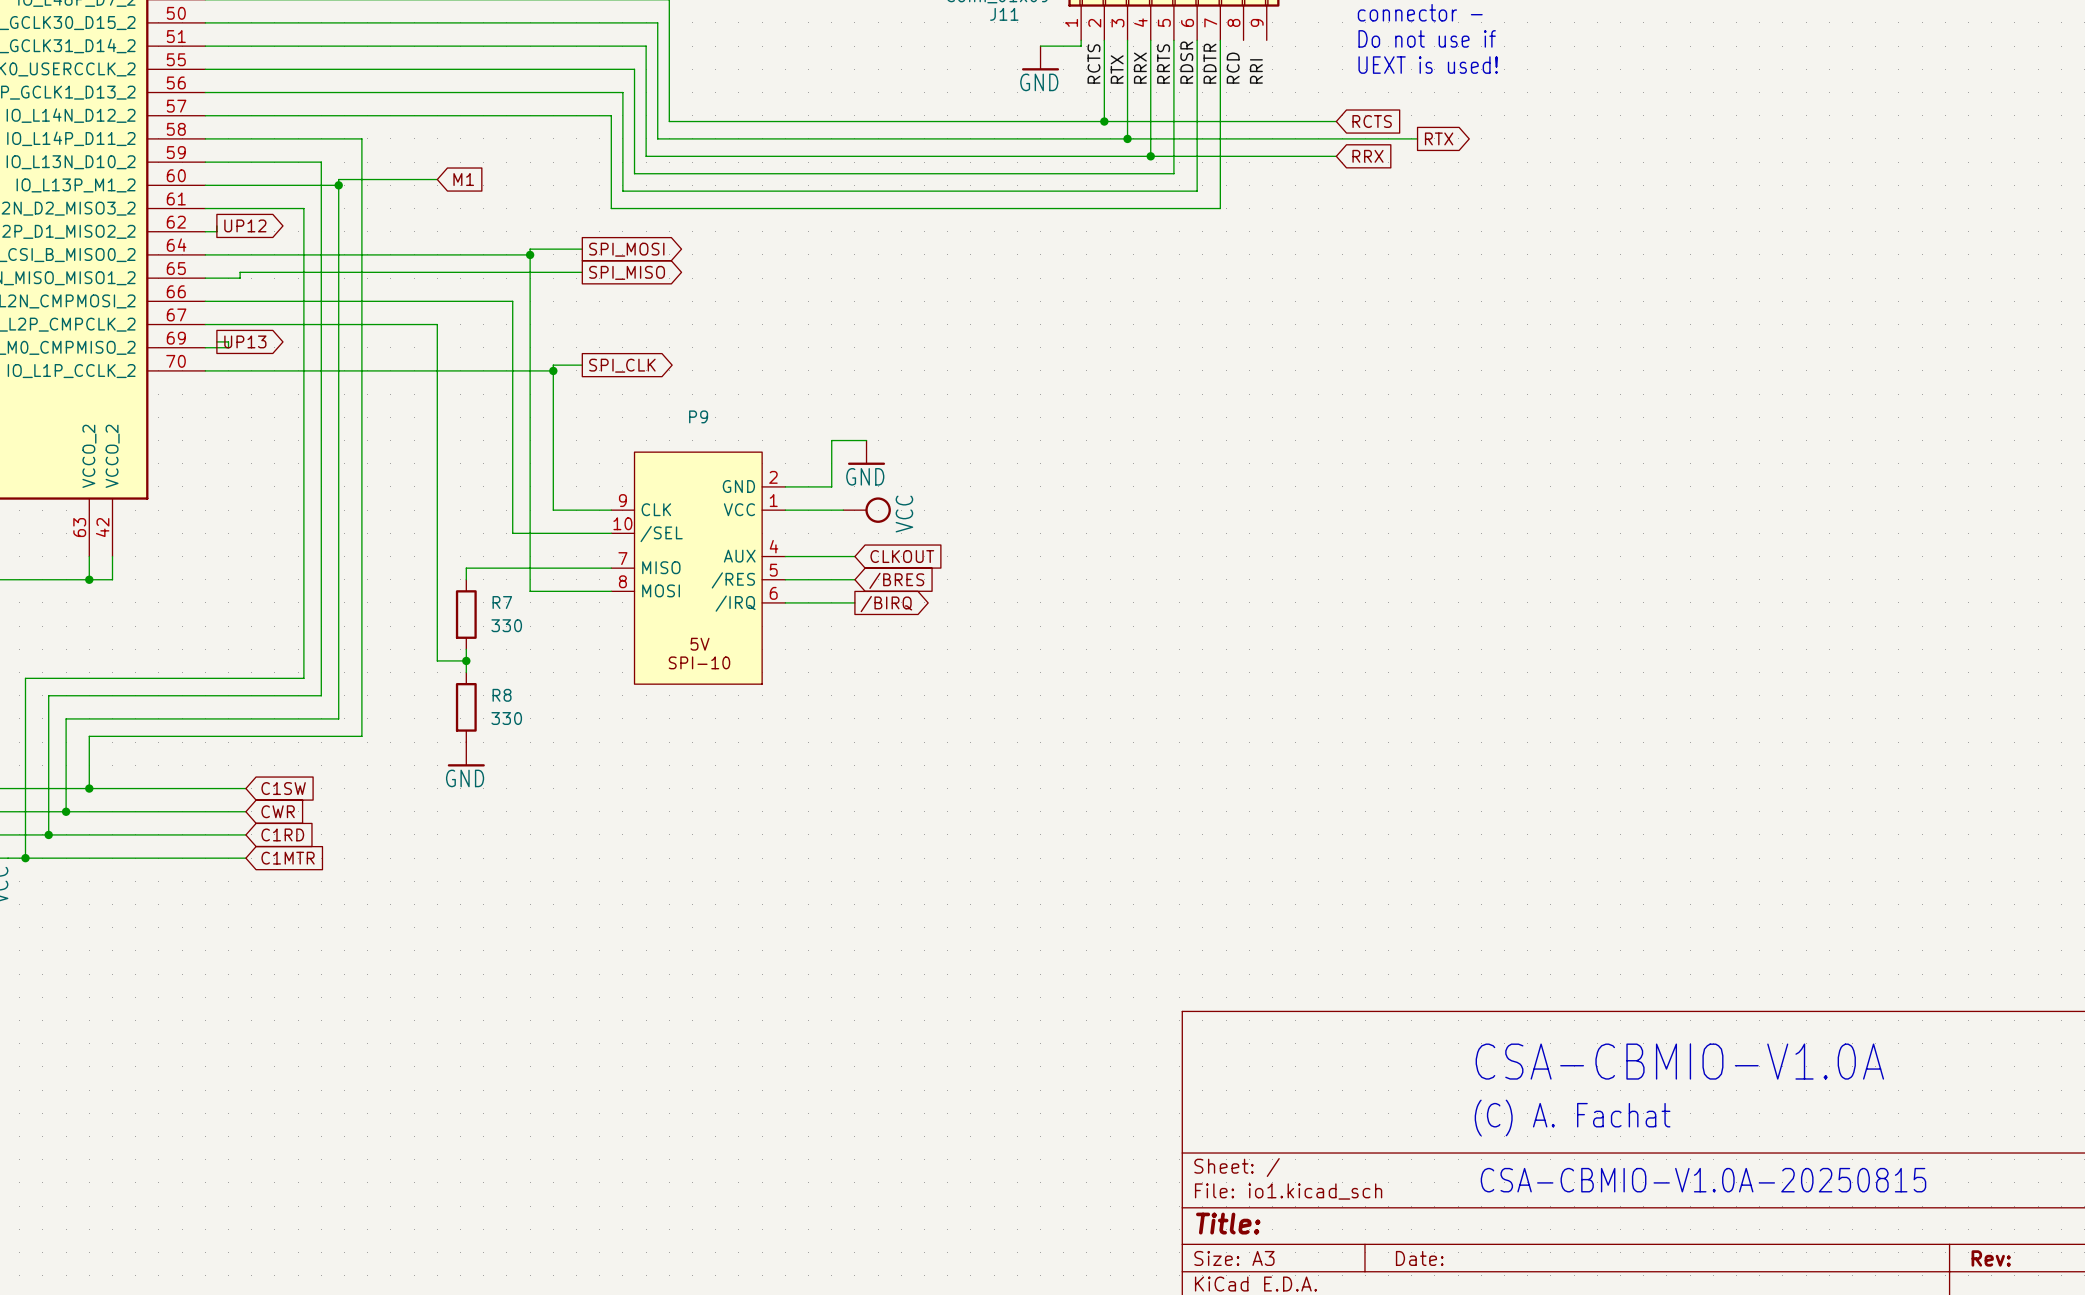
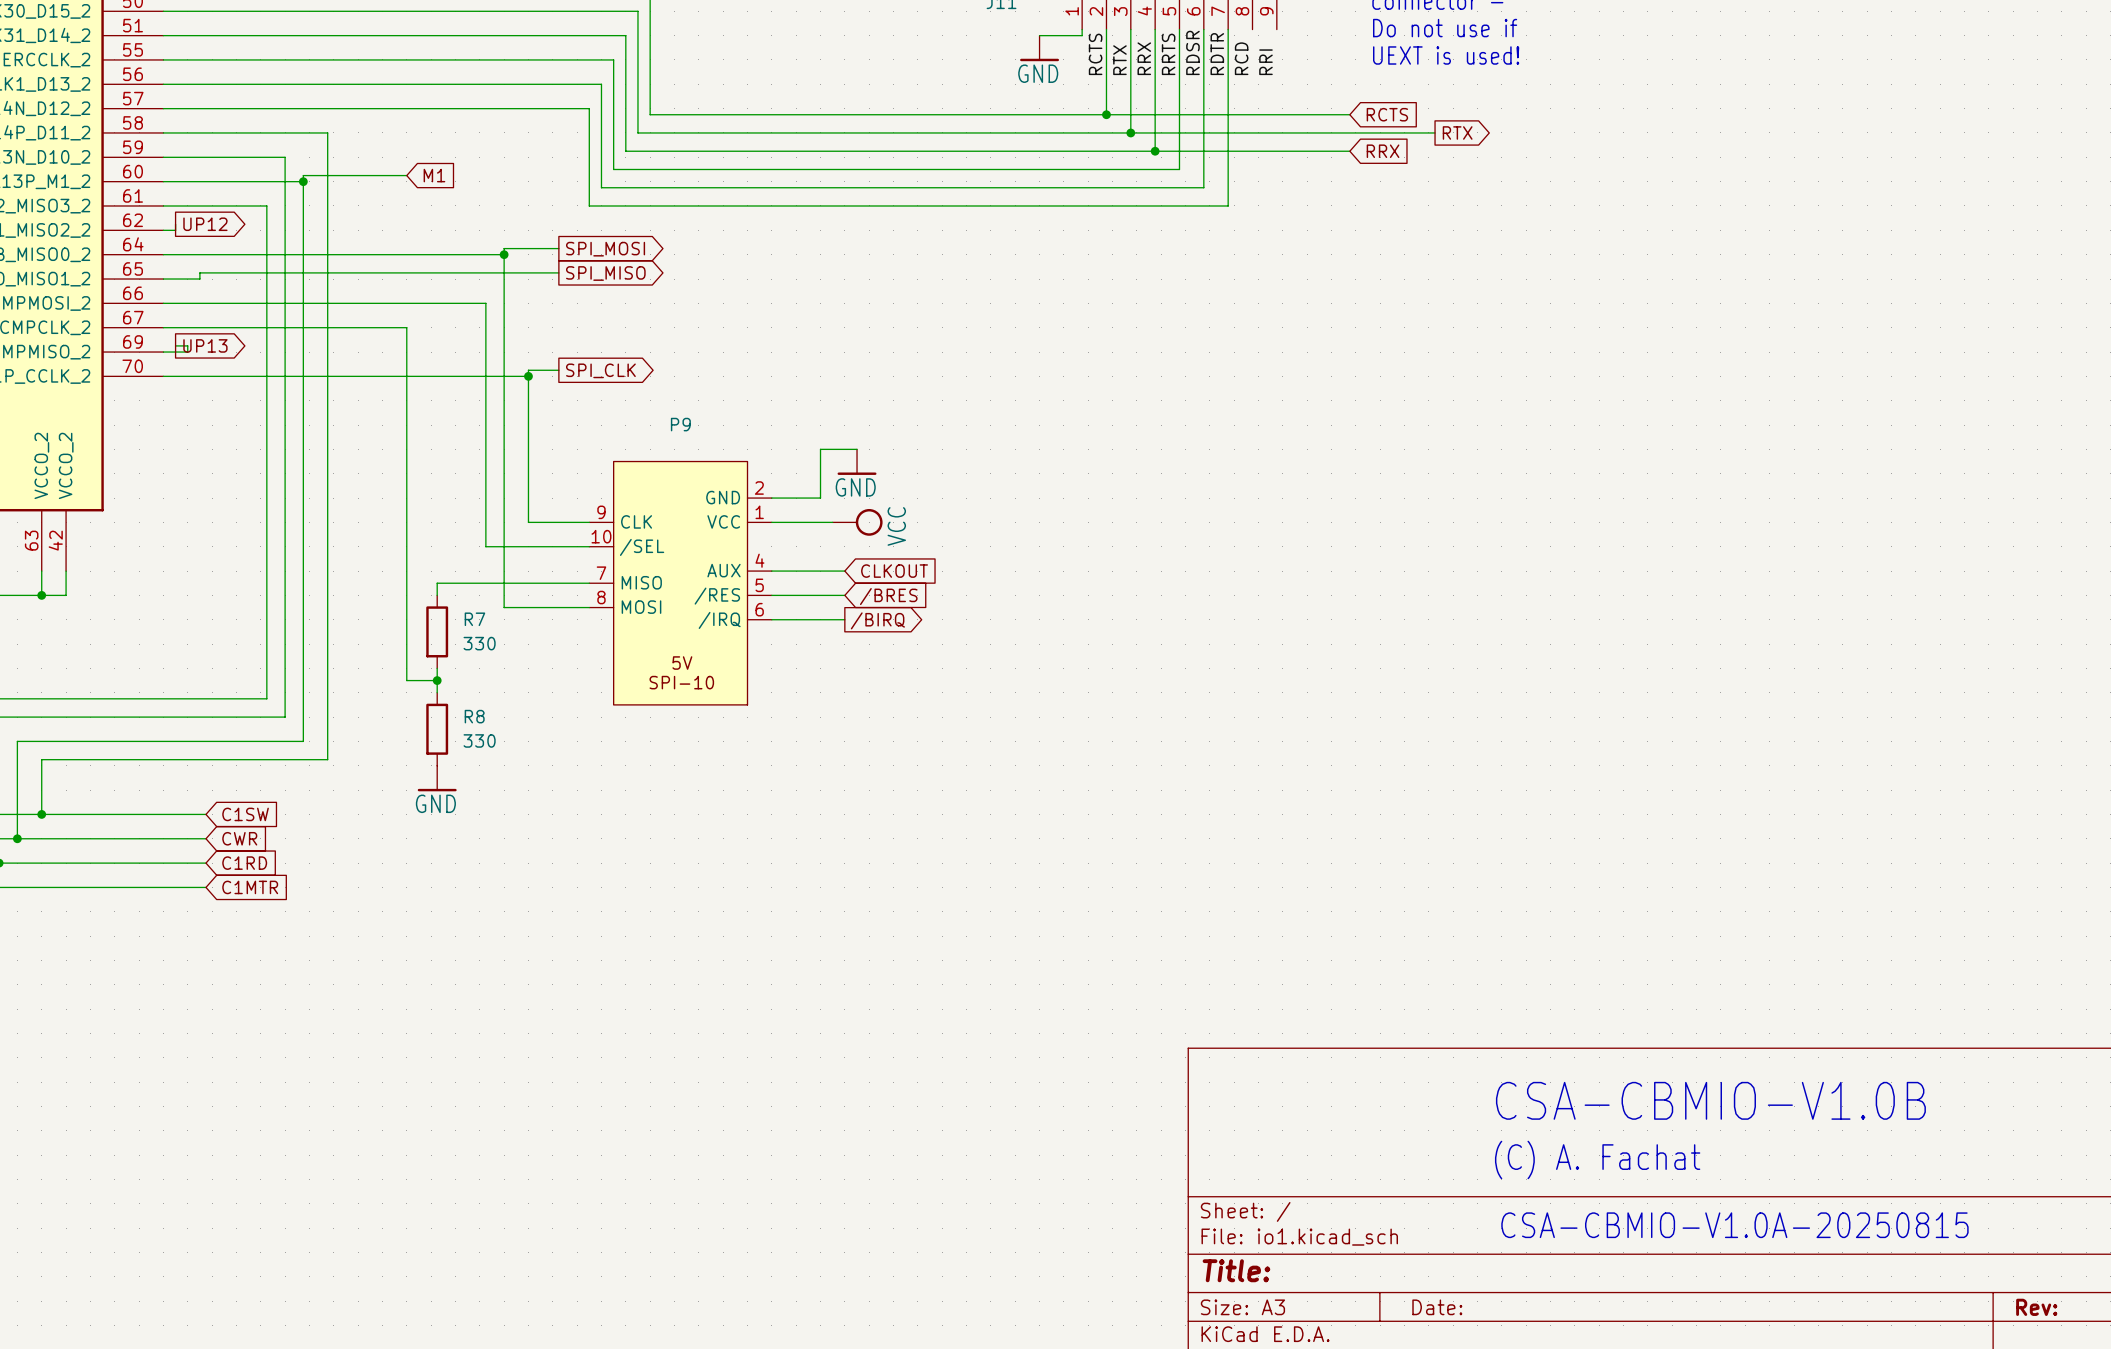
text: CSA-CBMIO-V1.0A (1679, 1061) -> CSA-CBMIO-V1.0B (1710, 1100)

